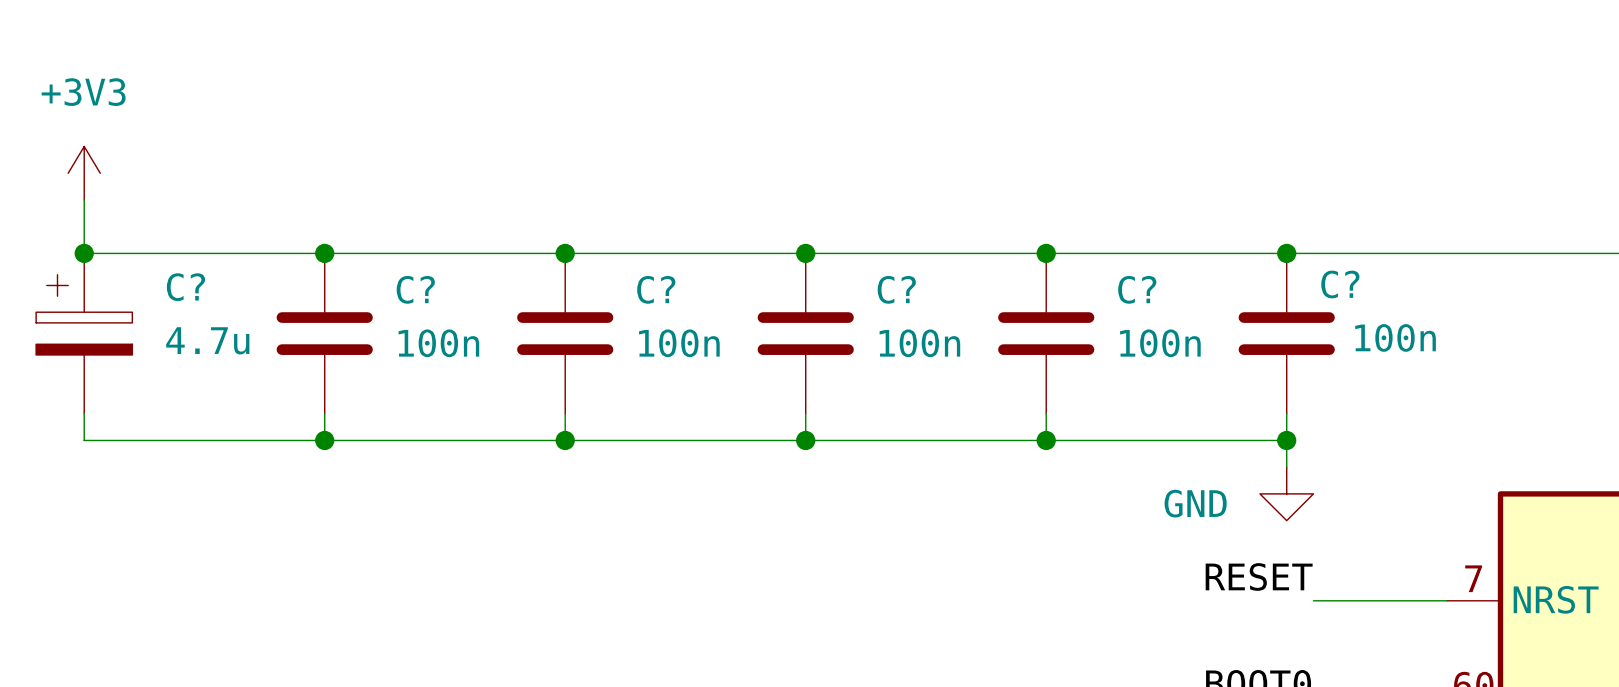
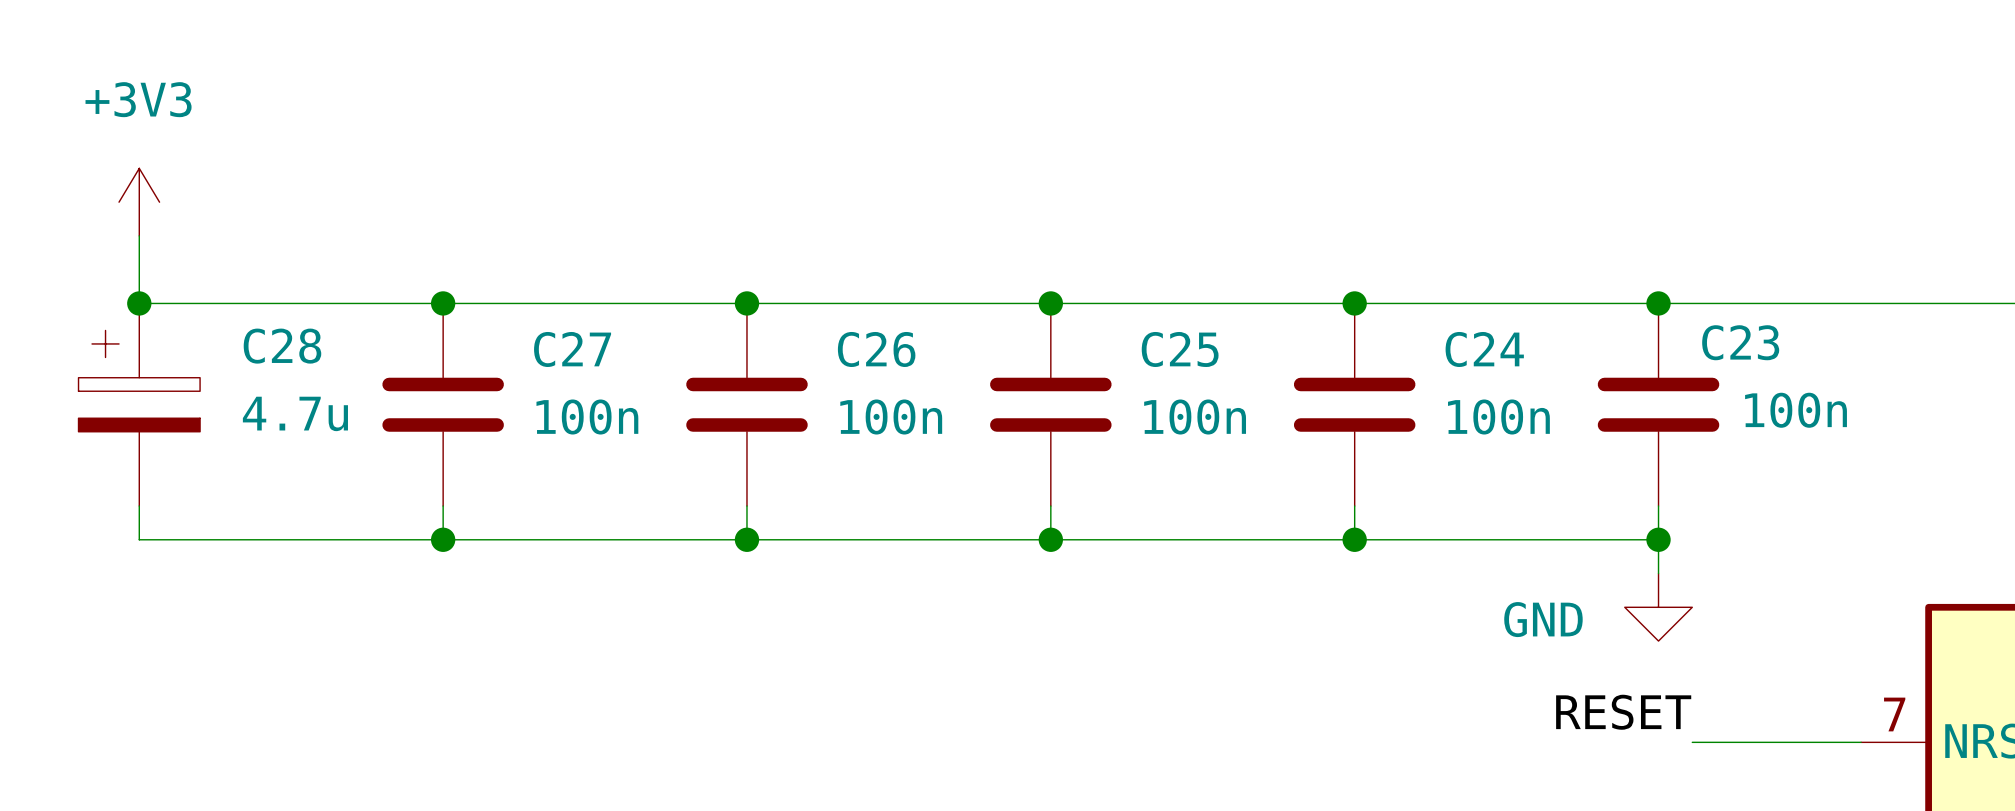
C? name: C? (1340, 284) -> C23 (1740, 342)
C? name: C? (185, 287) -> C28 (282, 346)
C? name: C? (415, 289) -> C27 (572, 349)
C? name: C? (656, 289) -> C26 (876, 349)
C? name: C? (896, 289) -> C25 (1180, 349)
C? name: C? (1137, 289) -> C24 (1484, 349)

